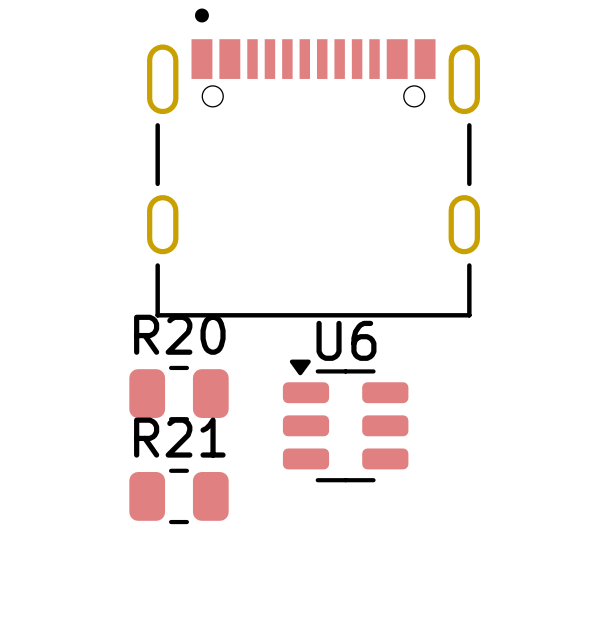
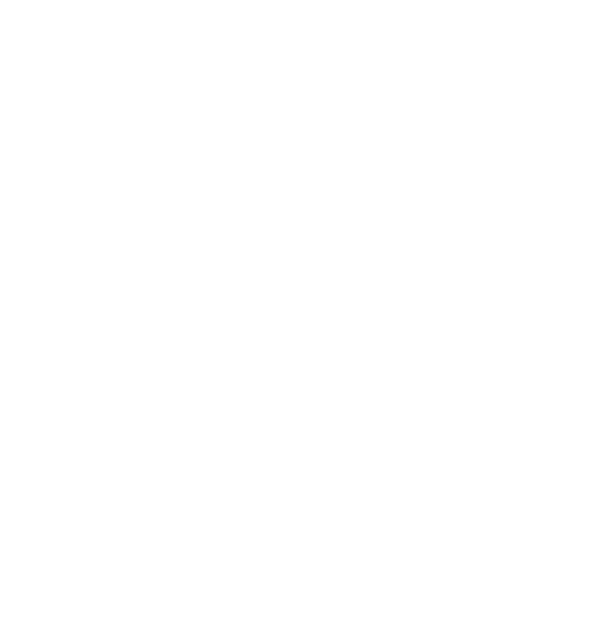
part: (313, 163) -> none
R20: (179, 393) -> none
U6: (345, 420) -> none
R21: (179, 496) -> none

